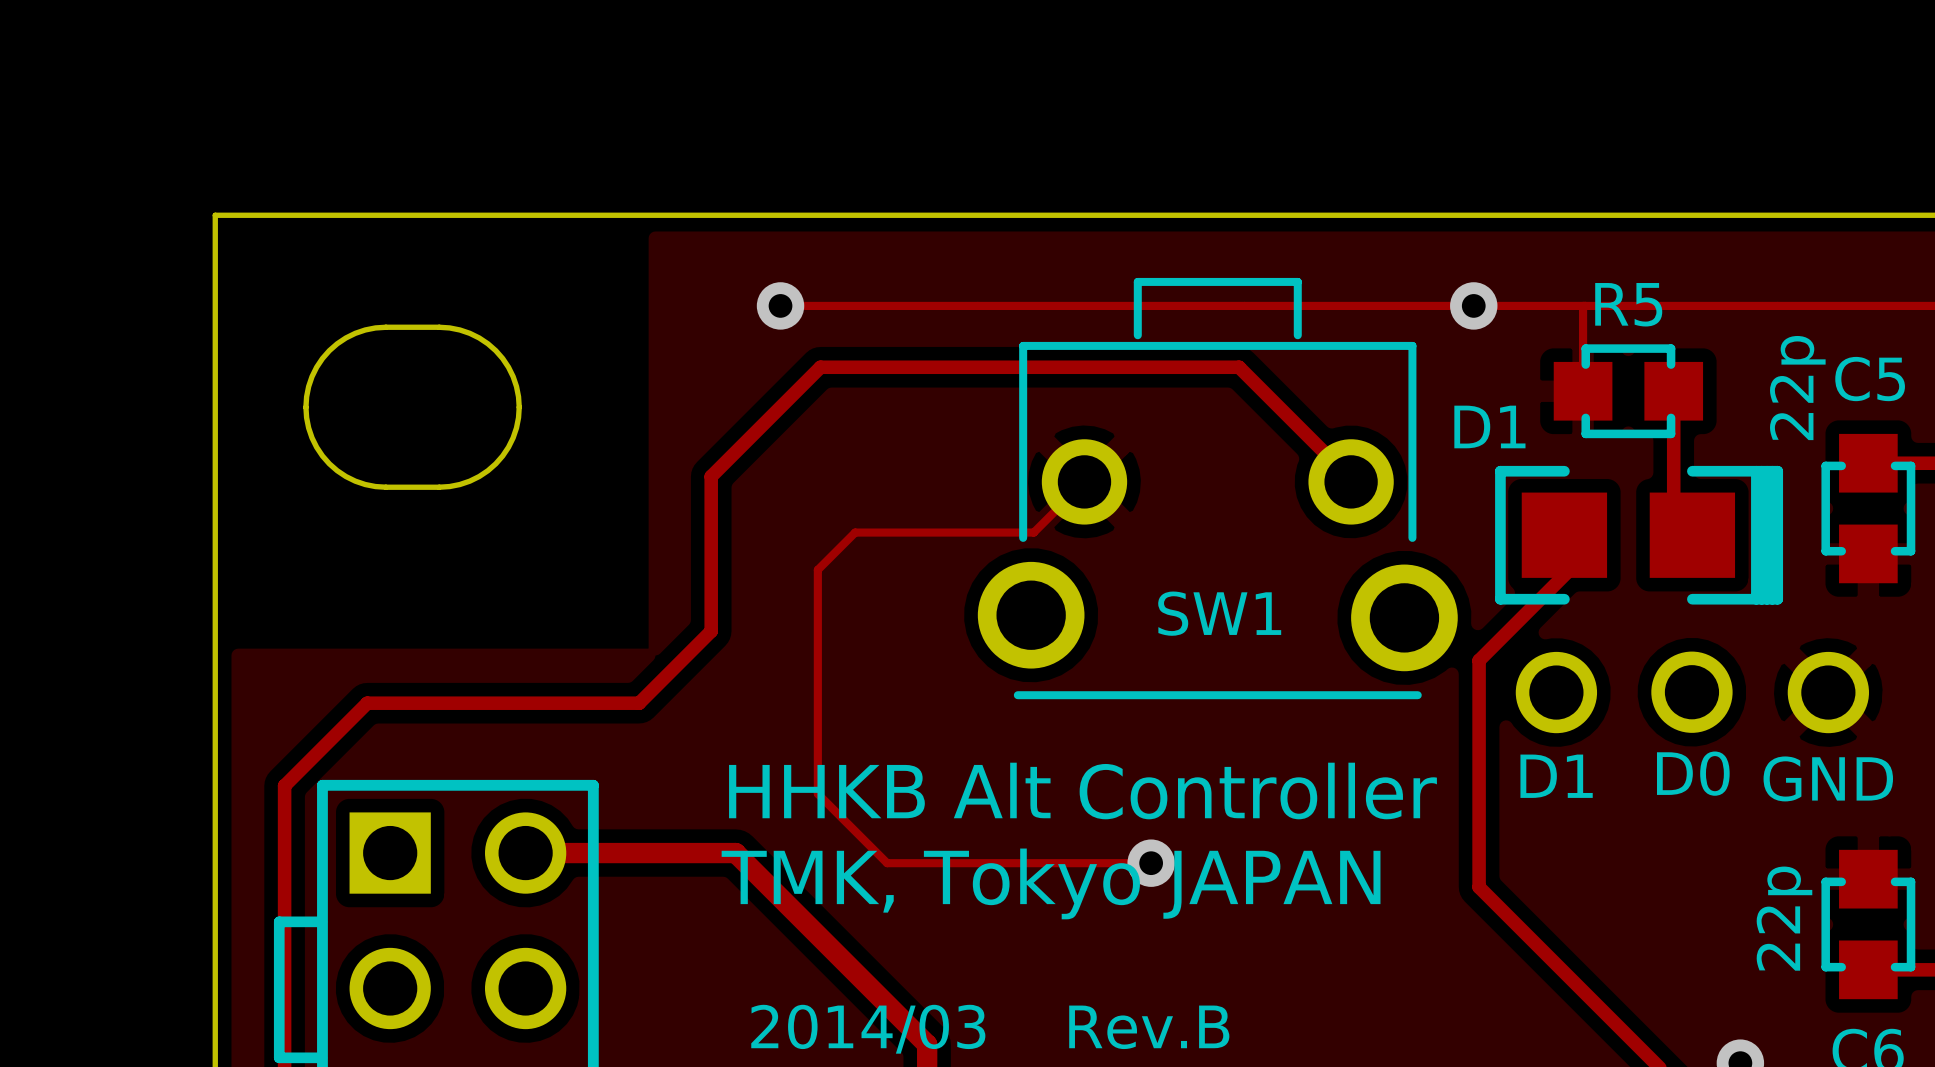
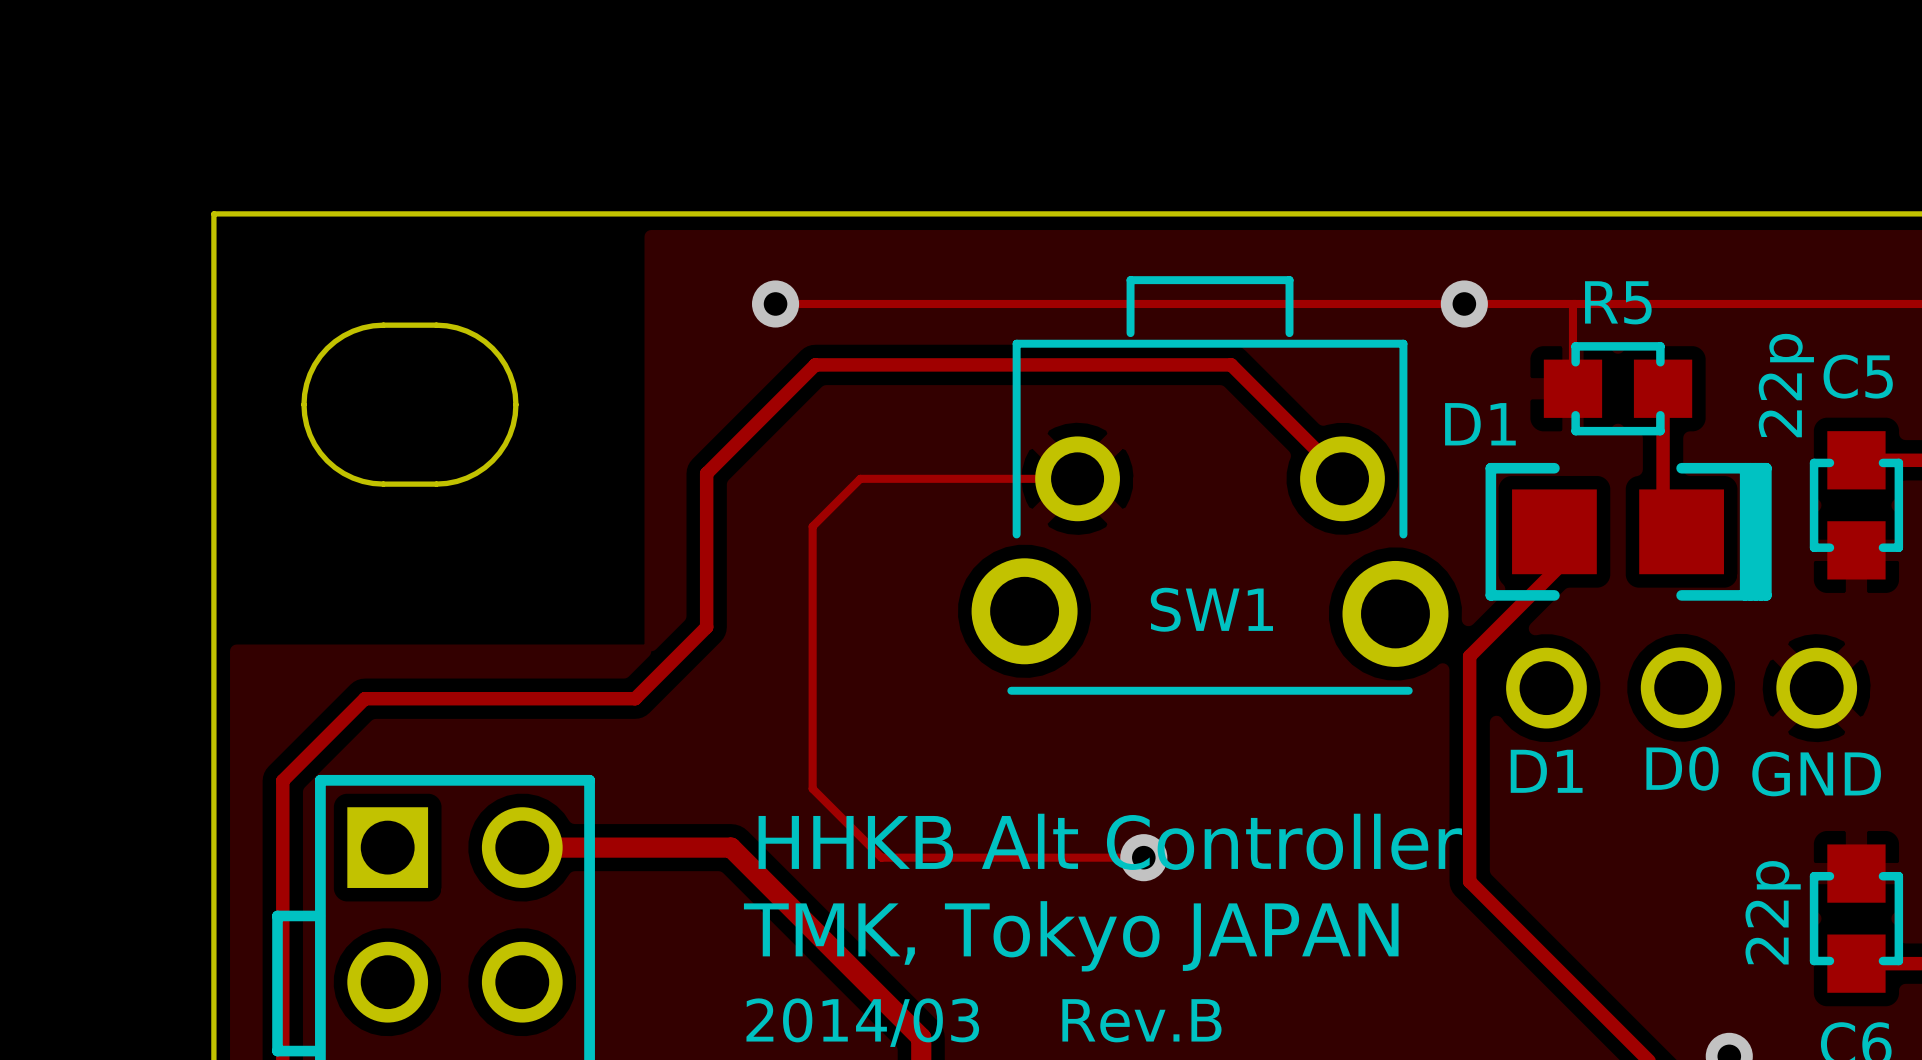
track: (1084, 481) (1033, 532) (855, 532) (817, 569) -> (1077, 478) (860, 478) (812, 526) (812, 566)
text position: HHKB Alt Controller (1082, 790) -> HHKB Alt Controller (1110, 841)
text position: TMK, Tokyo JAPAN (1051, 883) -> TMK, Tokyo JAPAN (1071, 936)

